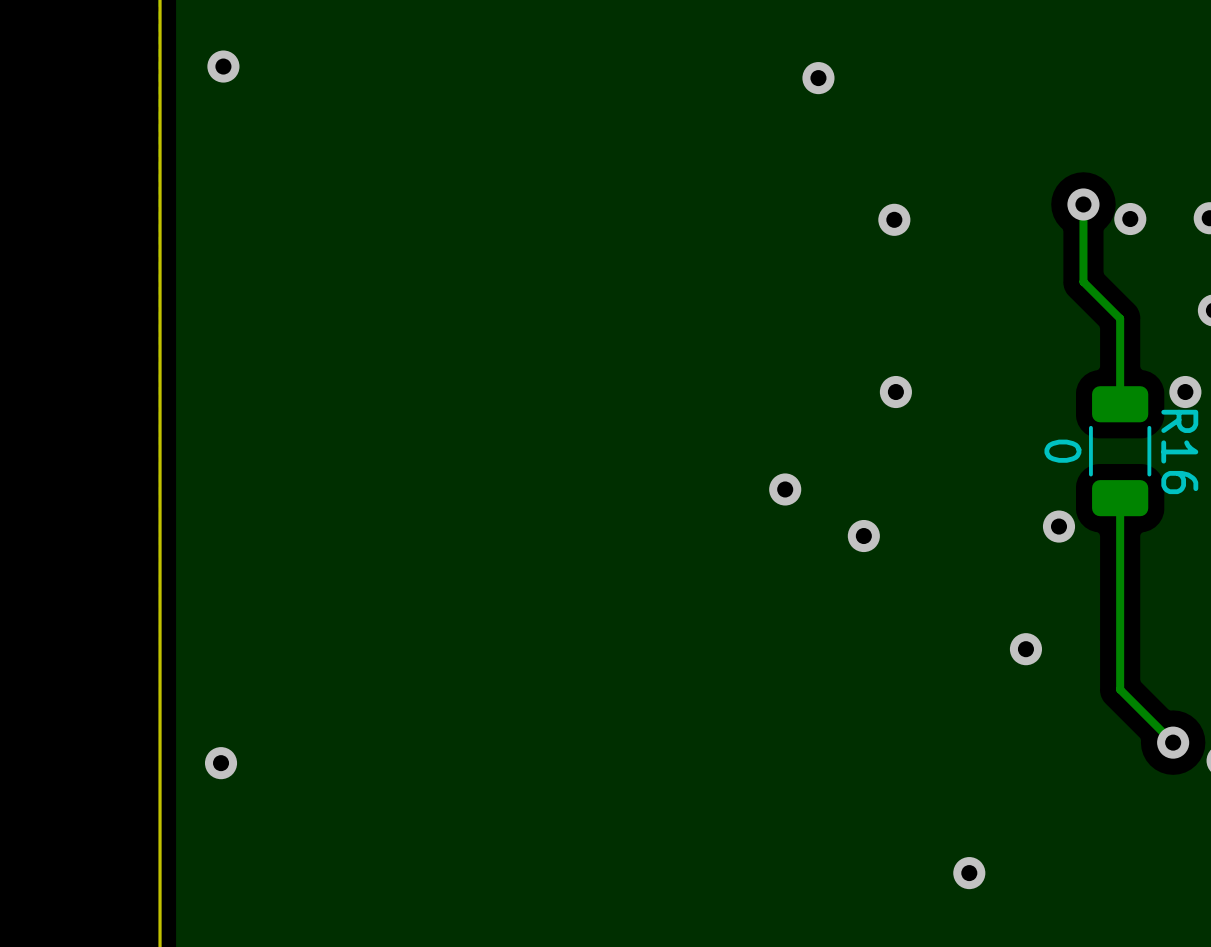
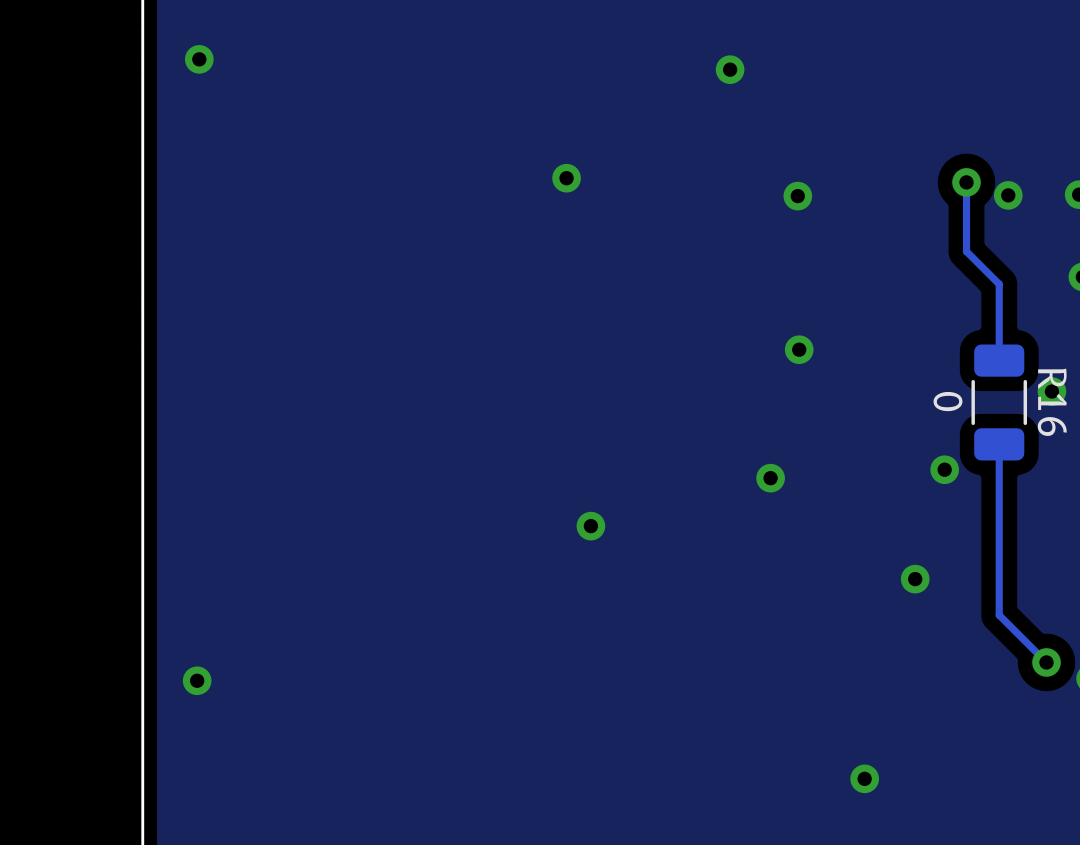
via: none -> (566, 178)
via position: (1185, 392) -> (1051, 391)
via position: (785, 489) -> (590, 526)

